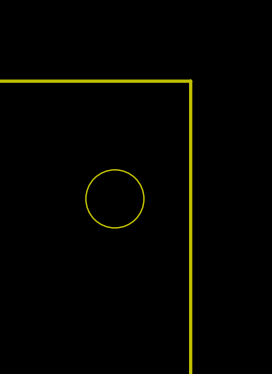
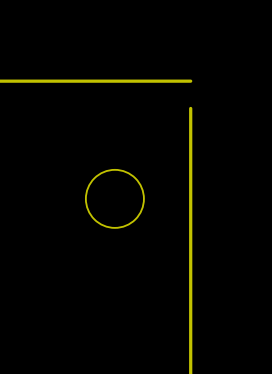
board edge: (190, 81) (190, 108) -> none

